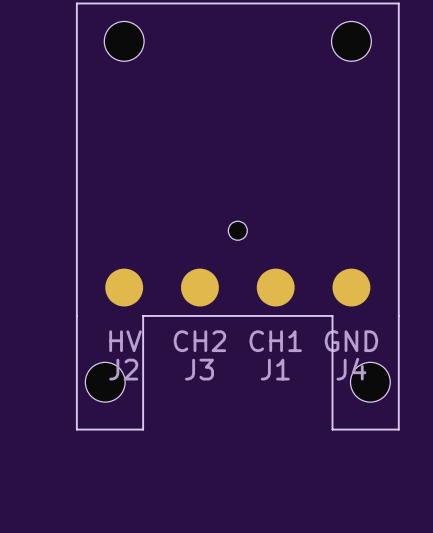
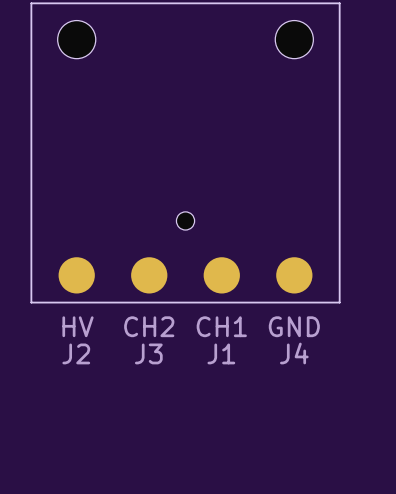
board edge: (143, 315) (143, 429) (76, 429) (76, 315) -> (94, 302) (31, 302)
board edge: (398, 315) (398, 429) (332, 429) (332, 315) -> (339, 302) (276, 302)
part: (105, 382) -> none
part: (370, 382) -> none

